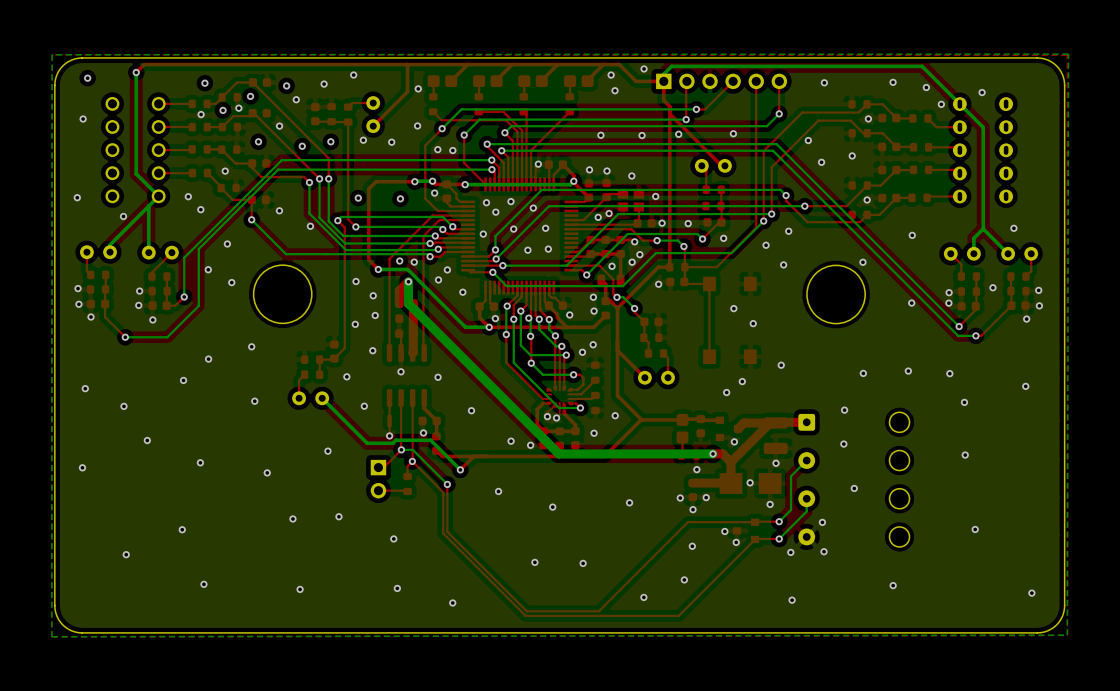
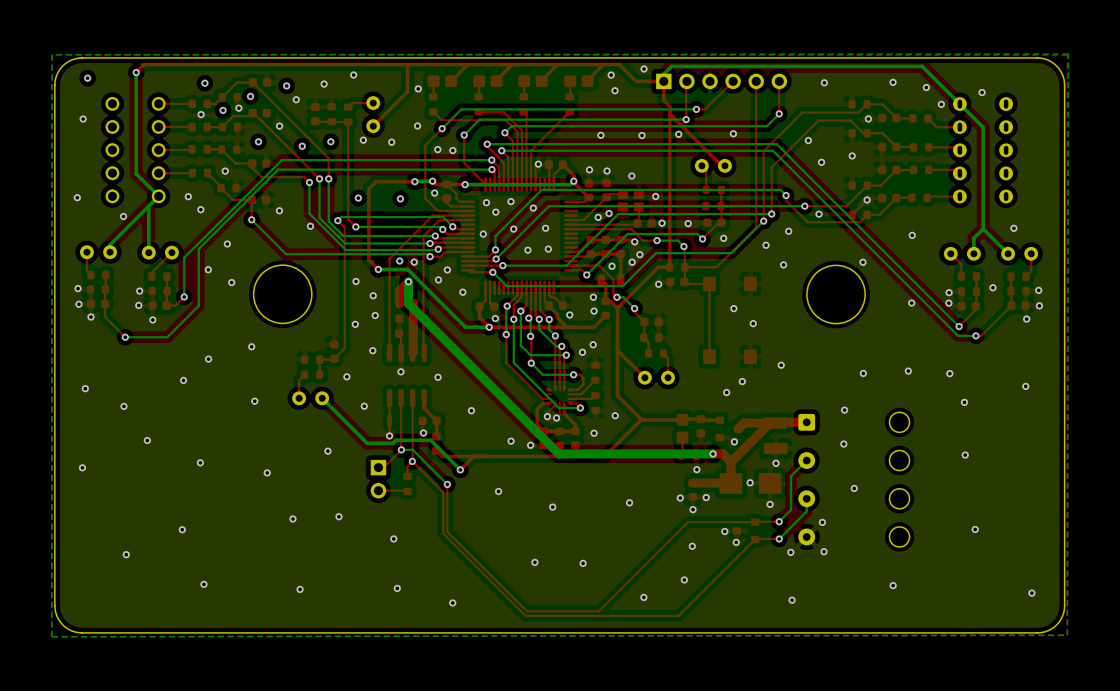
top track: none -> (867, 199) (852, 214)
via: none -> (819, 214)

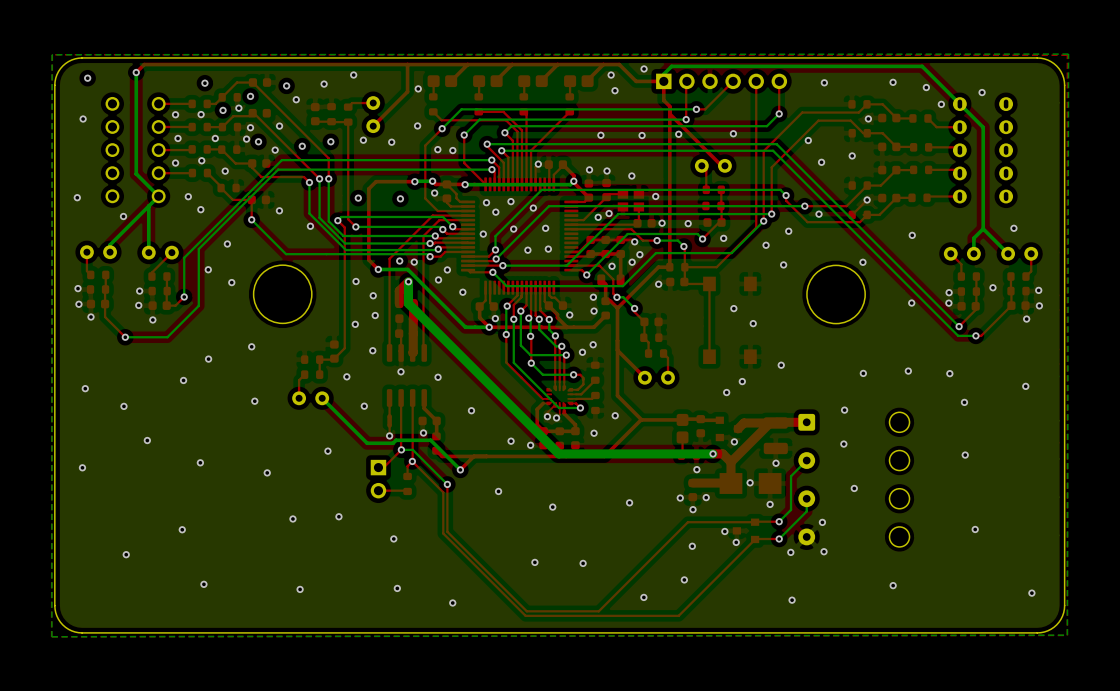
via: none -> (175, 114)
via: none -> (250, 127)
via: none -> (178, 138)
via: none -> (215, 138)
via: none -> (246, 139)
via: none -> (275, 150)
via: none -> (201, 160)
via: none -> (175, 163)

